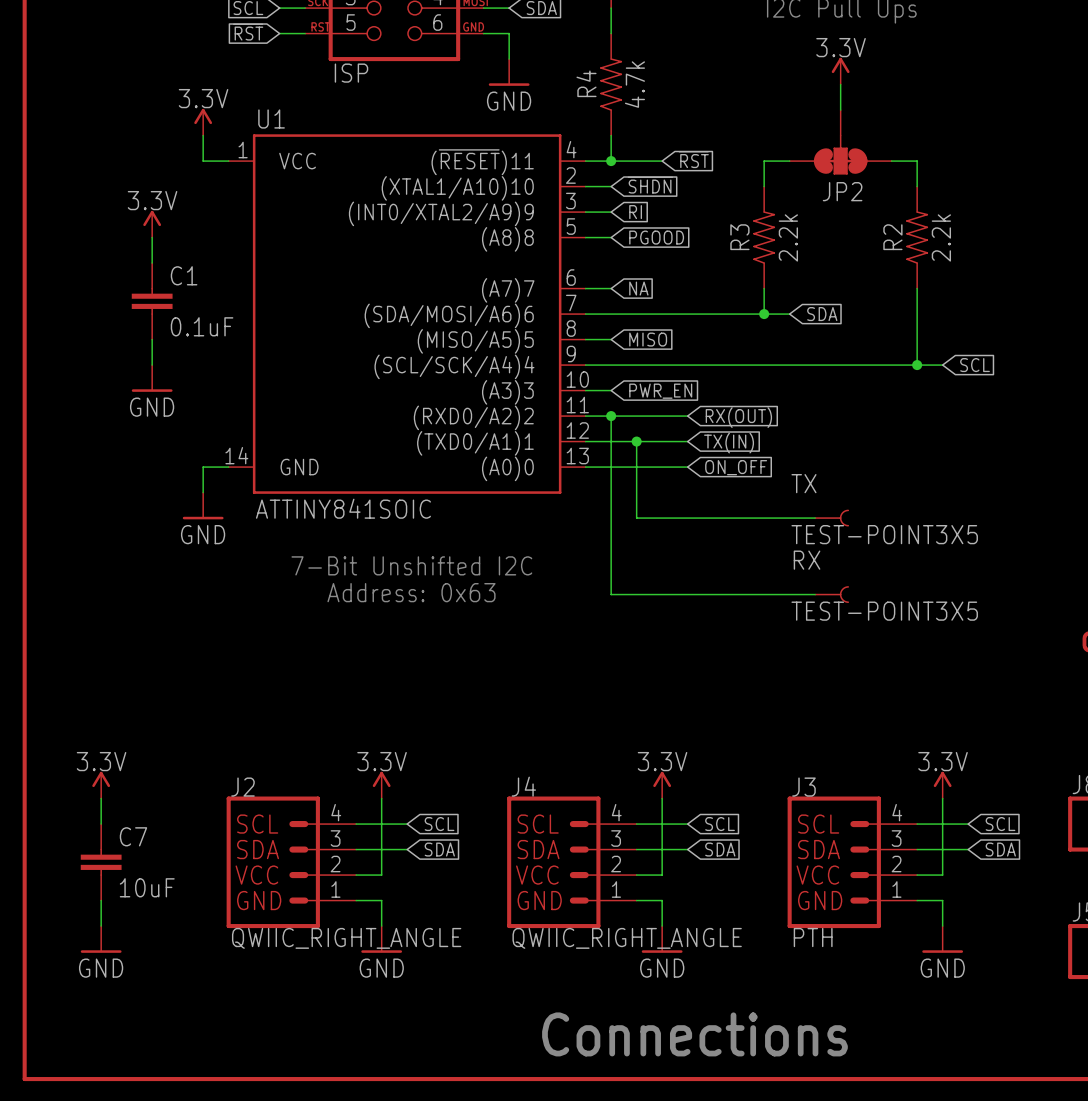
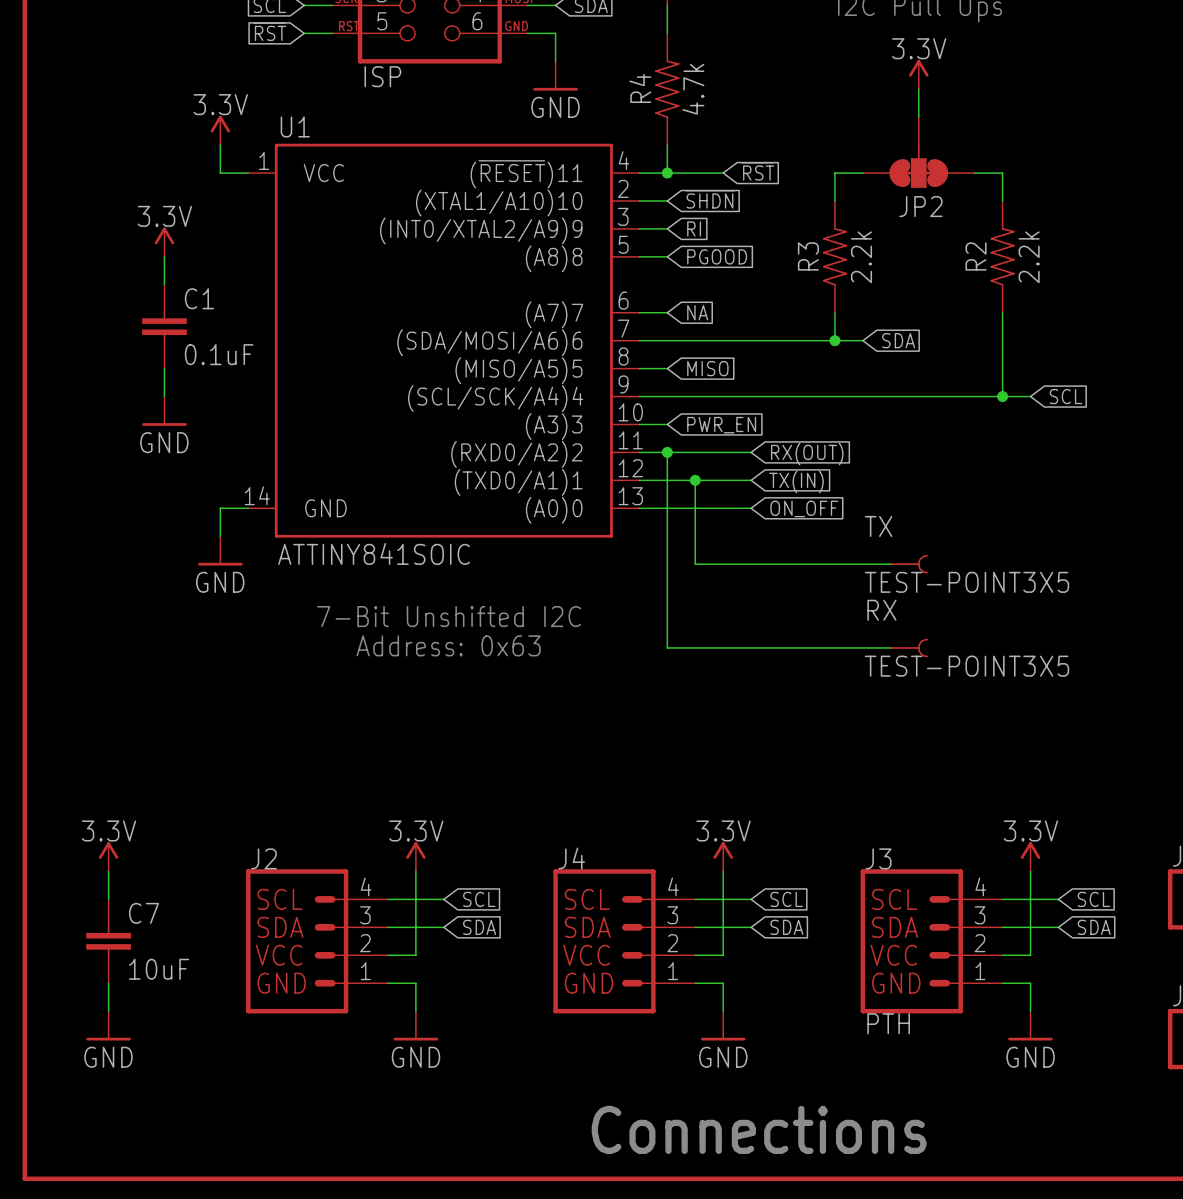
J2 value: QWIIC_RIGHT_ANGLE (346, 938) -> none
J4 value: QWIIC_RIGHT_ANGLE (627, 938) -> none

